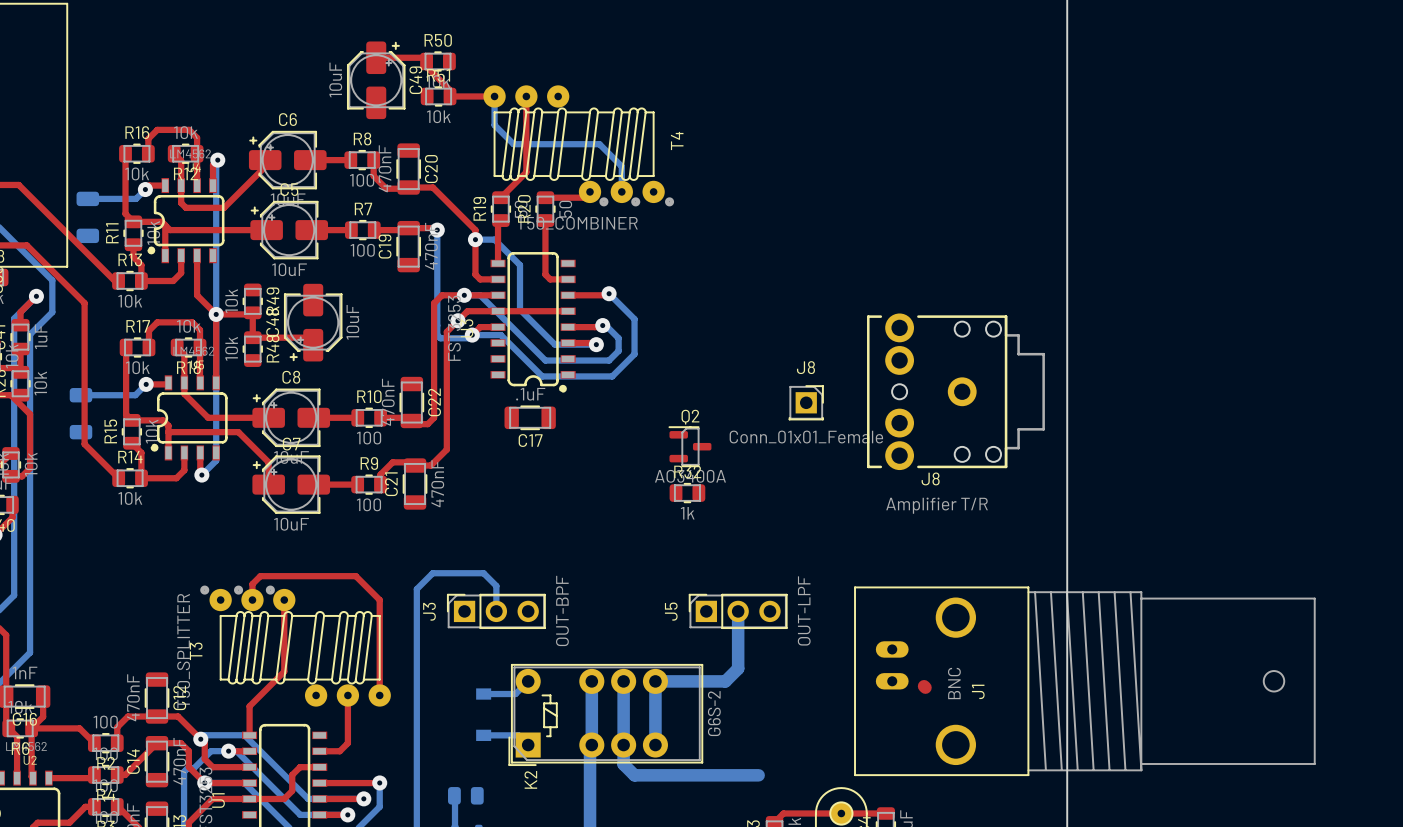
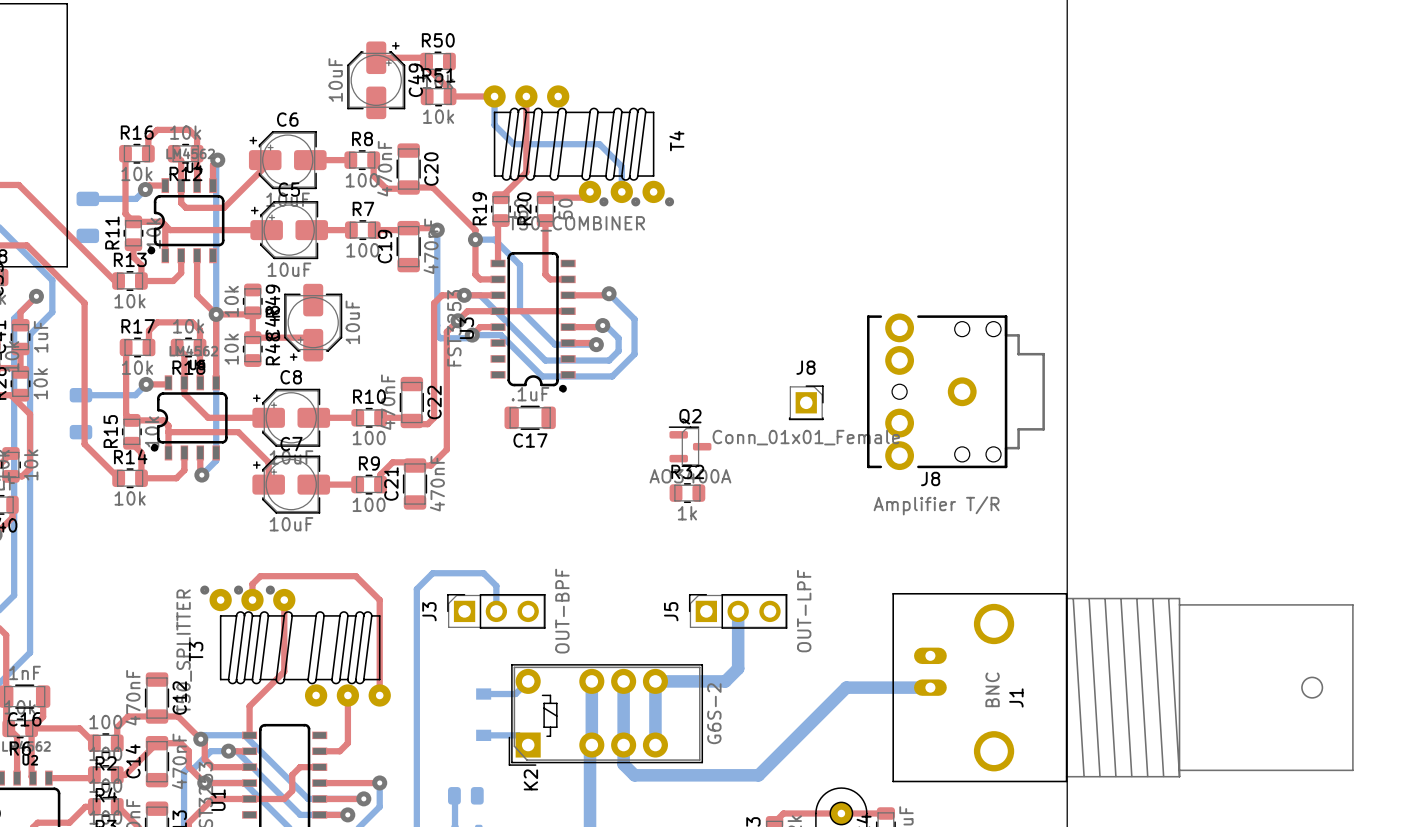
J1 position: (1084, 681) -> (1123, 687)
top track: (924, 686) (925, 687) -> none
bottom track: none -> (930, 687) (846, 687) (758, 775)

